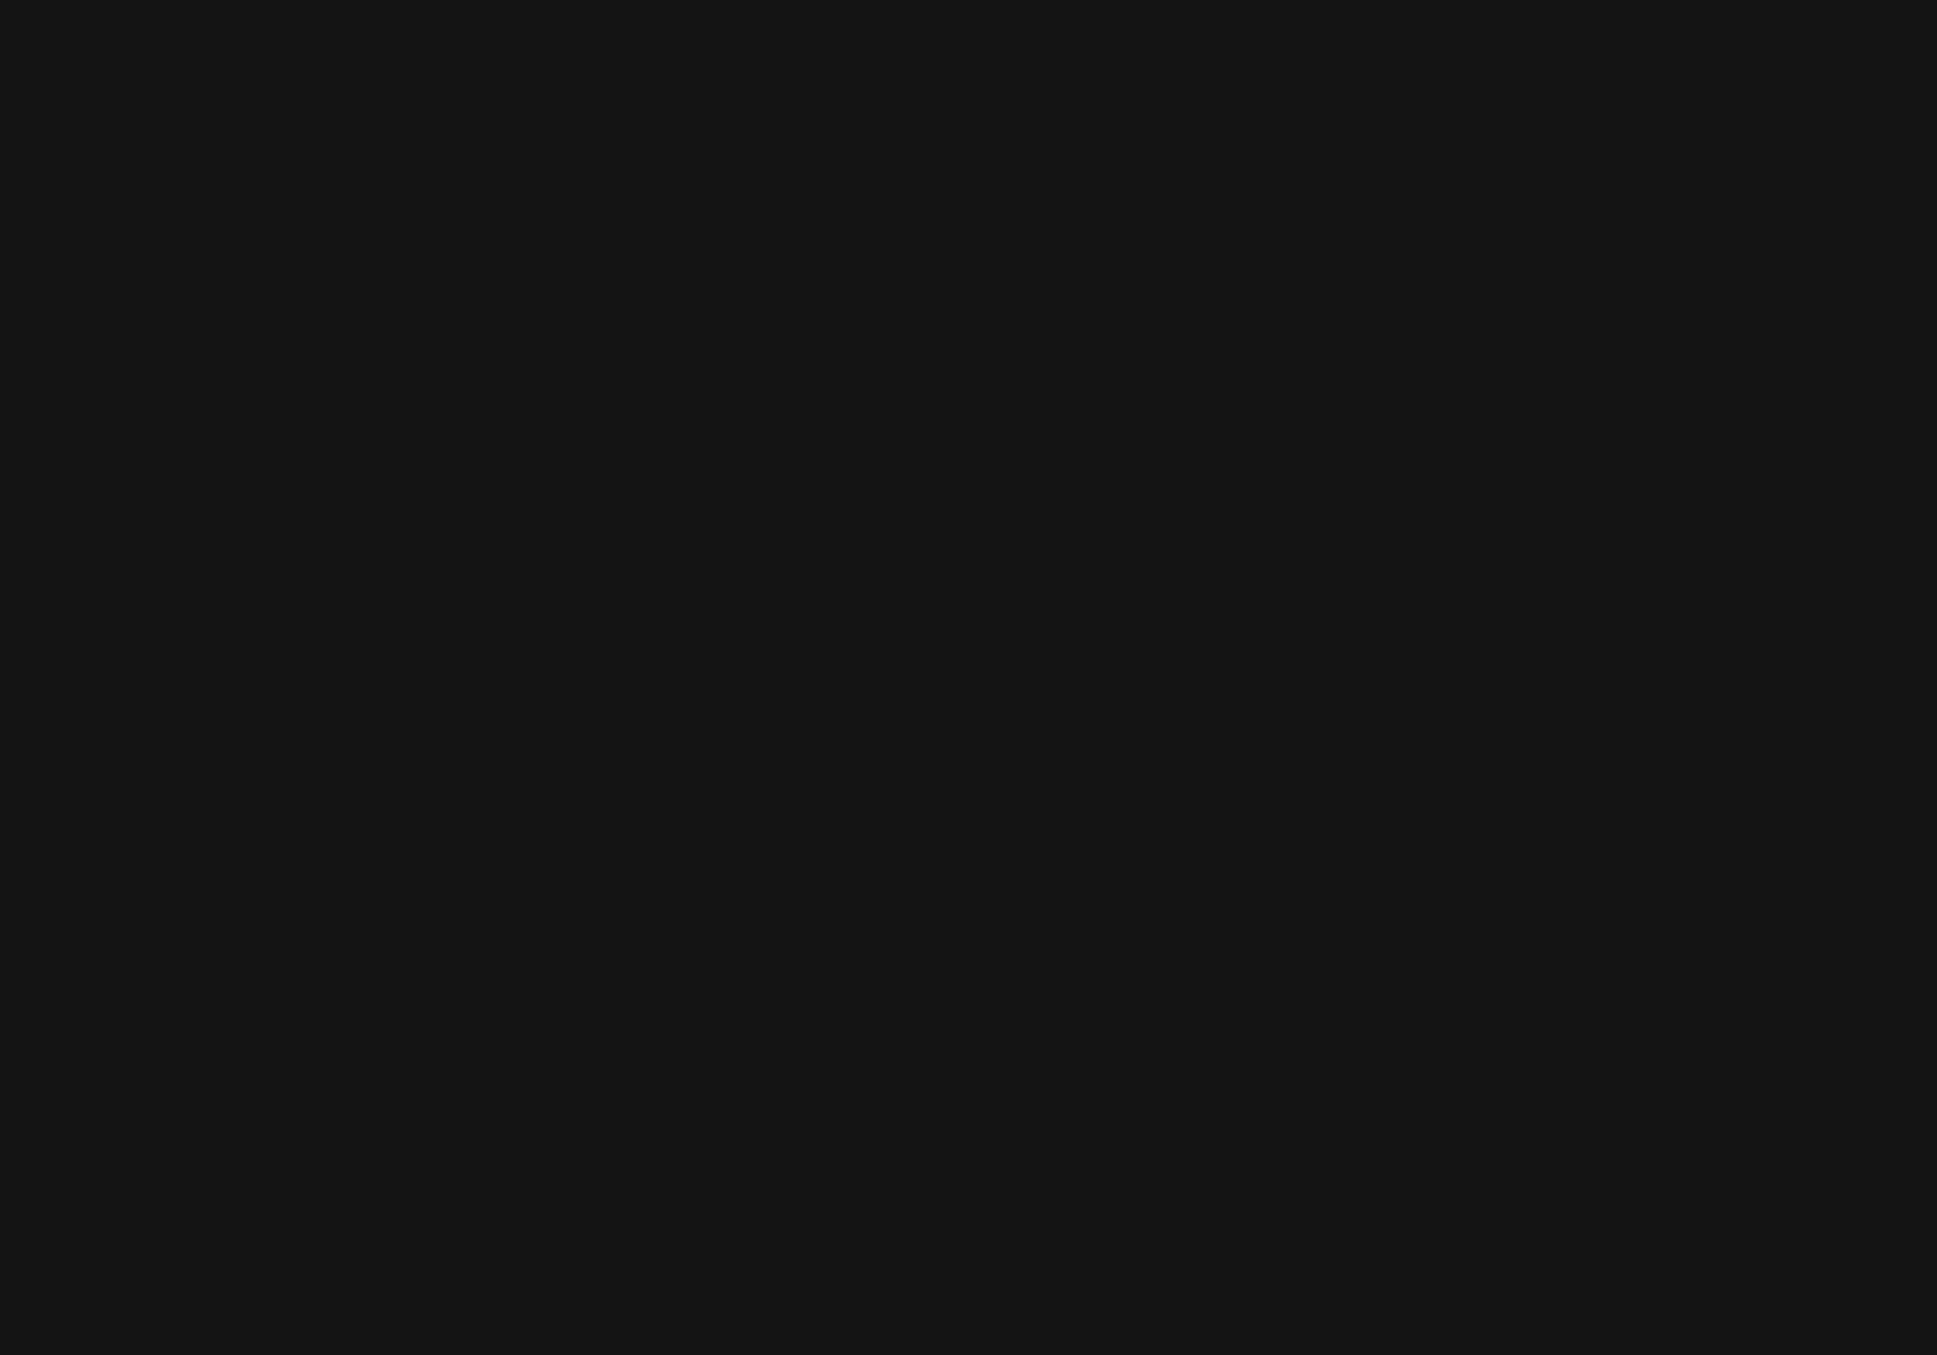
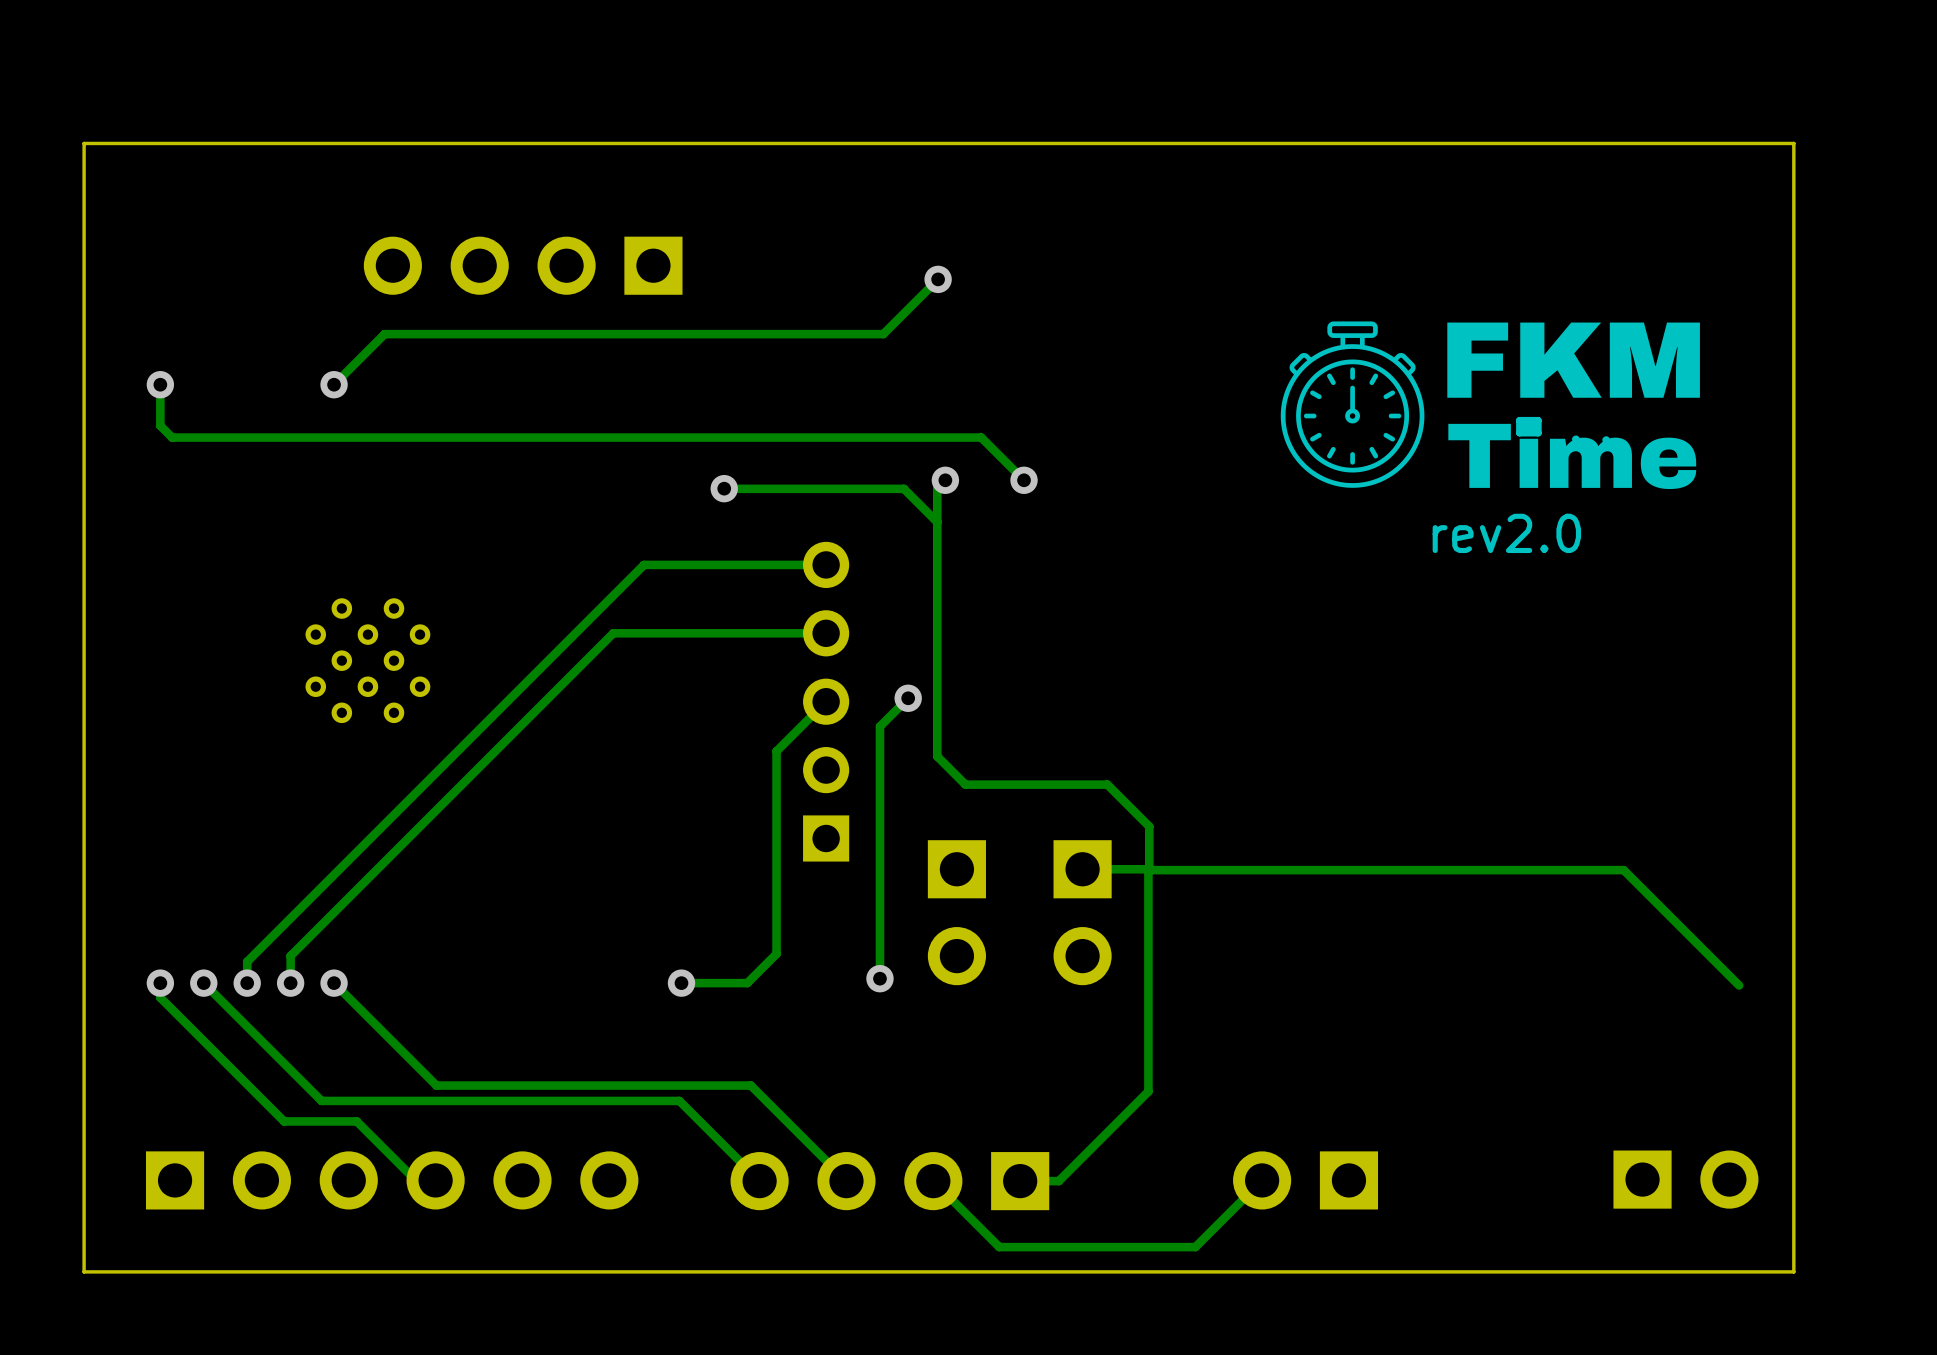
board edge: none -> (1793, 143) (84, 143) (84, 1271) (1793, 1271) (1793, 143)
part: none -> (523, 265)
track: none -> (938, 279) (883, 334) (384, 334) (334, 384)
via: none -> (938, 279)
drawing: none -> [1280, 321, 1700, 490]
track: none -> (160, 384) (160, 425) (172, 437) (981, 437) (1024, 480)
via: none -> (160, 384)
via: none -> (334, 384)
line: none -> (1538, 420) (1519, 420) (1519, 432) (1538, 432) (1538, 420)
track: none -> (945, 480) (937, 488) (937, 756) (965, 784) (1107, 784) (1149, 826) (1149, 870)
via: none -> (945, 480)
via: none -> (1024, 480)
track: none -> (724, 488) (903, 488) (937, 522)
via: none -> (724, 488)
text: none -> rev2.0 (1506, 533)
track: none -> (826, 564) (644, 564) (247, 961) (247, 983)
track: none -> (826, 633) (613, 633) (290, 955) (290, 983)
part: none -> (367, 660)
track: none -> (908, 698) (879, 726) (879, 978)
via: none -> (908, 698)
track: none -> (826, 701) (776, 751) (776, 953) (747, 983) (681, 983)
part: none -> (826, 701)
track: none -> (1148, 869) (1082, 869)
track: none -> (1148, 869) (1148, 1091) (1058, 1181) (1020, 1181)
track: none -> (1149, 870) (1623, 870) (1739, 985)
part: none -> (956, 912)
part: none -> (1082, 912)
via: none -> (879, 978)
track: none -> (160, 983) (160, 997) (284, 1121) (356, 1121) (415, 1180) (435, 1180)
via: none -> (160, 983)
track: none -> (203, 983) (321, 1100) (679, 1100) (759, 1181)
via: none -> (203, 983)
via: none -> (247, 983)
via: none -> (290, 983)
track: none -> (334, 983) (436, 1085) (750, 1085) (846, 1181)
via: none -> (334, 983)
via: none -> (681, 983)
part: none -> (1685, 1179)
part: none -> (392, 1180)
track: none -> (1262, 1180) (1195, 1247) (999, 1247) (933, 1181)
part: none -> (1305, 1180)
part: none -> (889, 1181)

